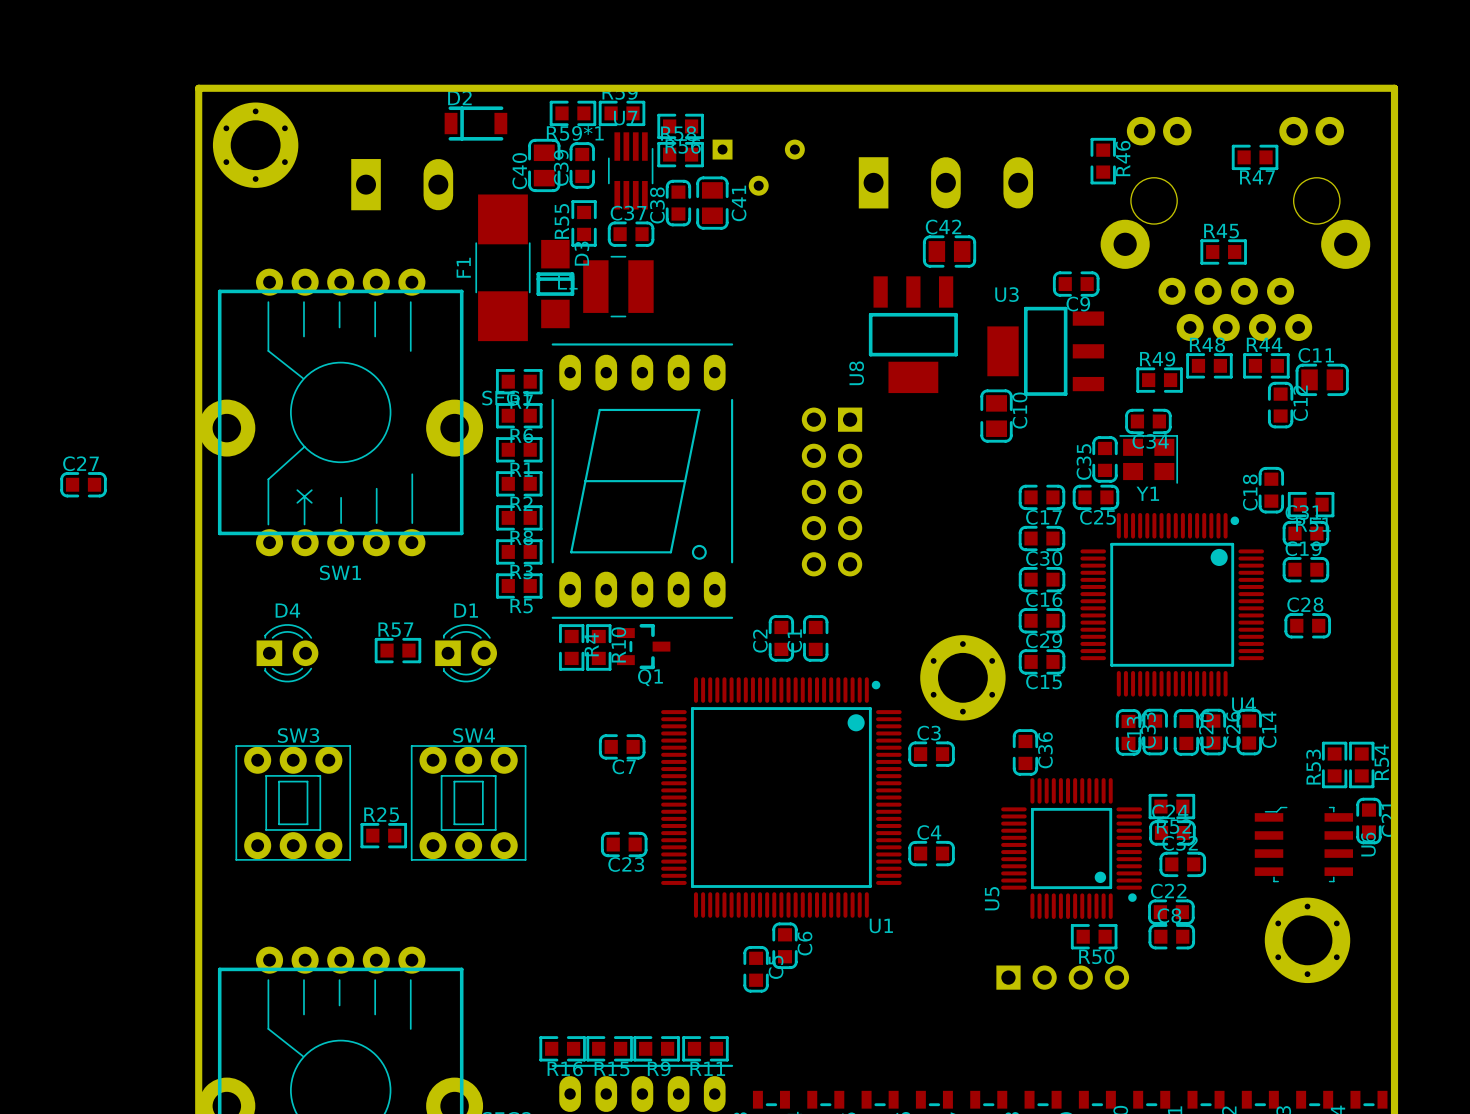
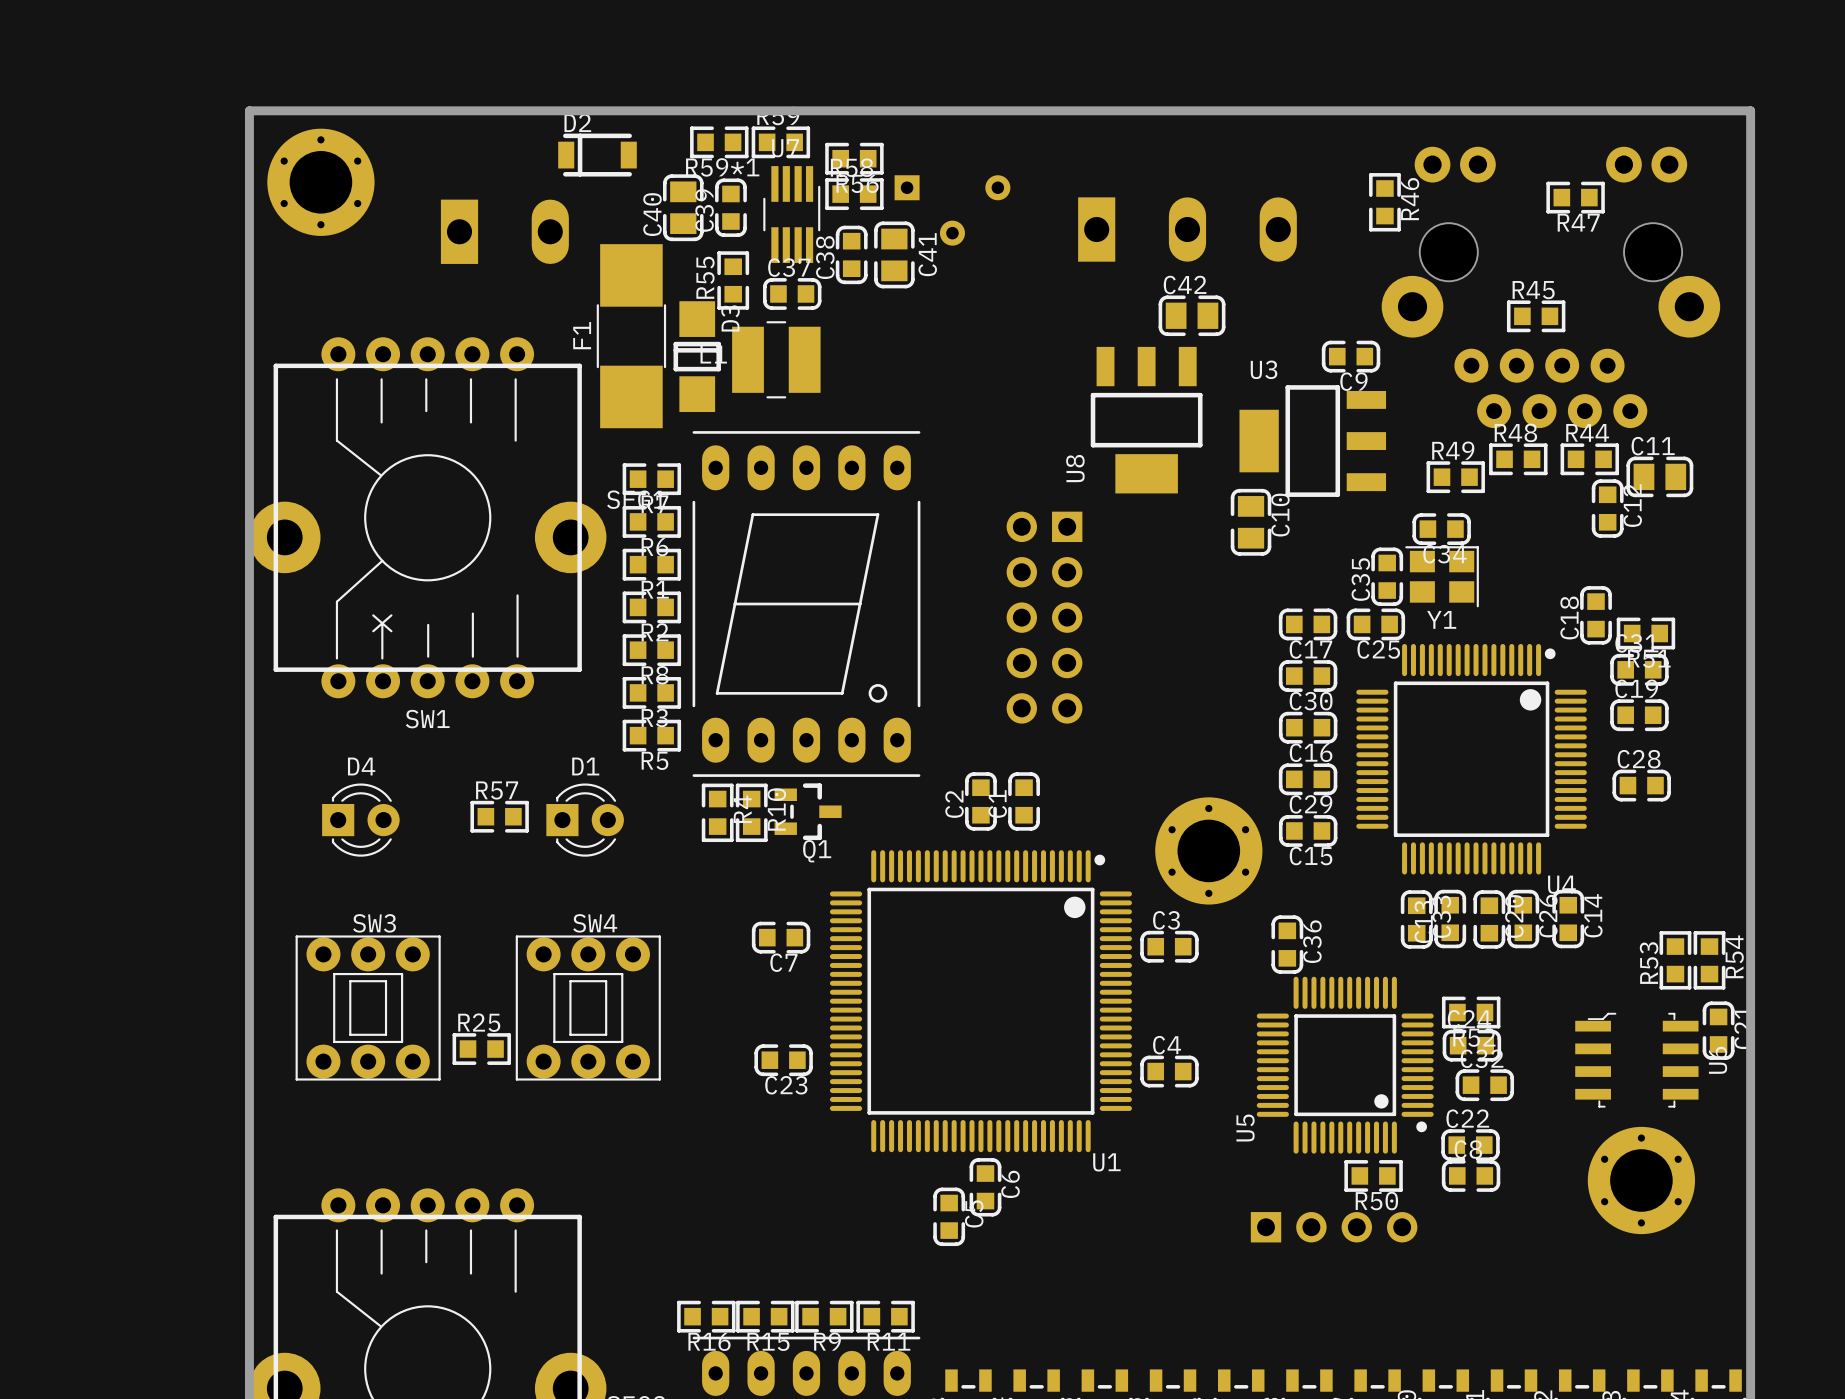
C27: (83, 484) -> none

